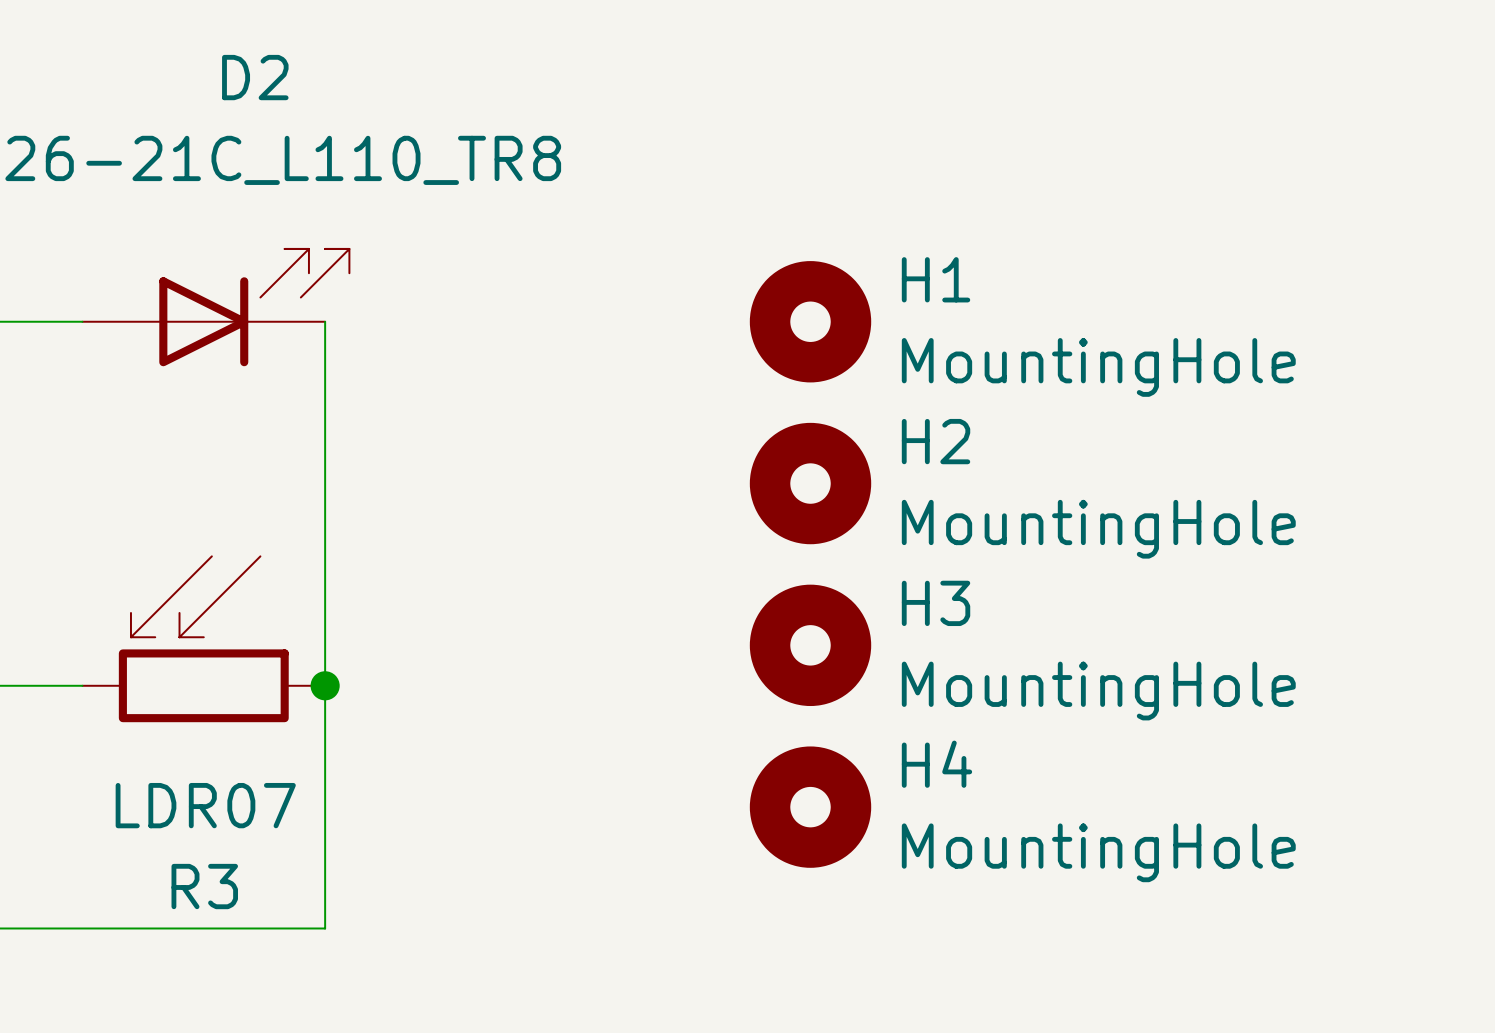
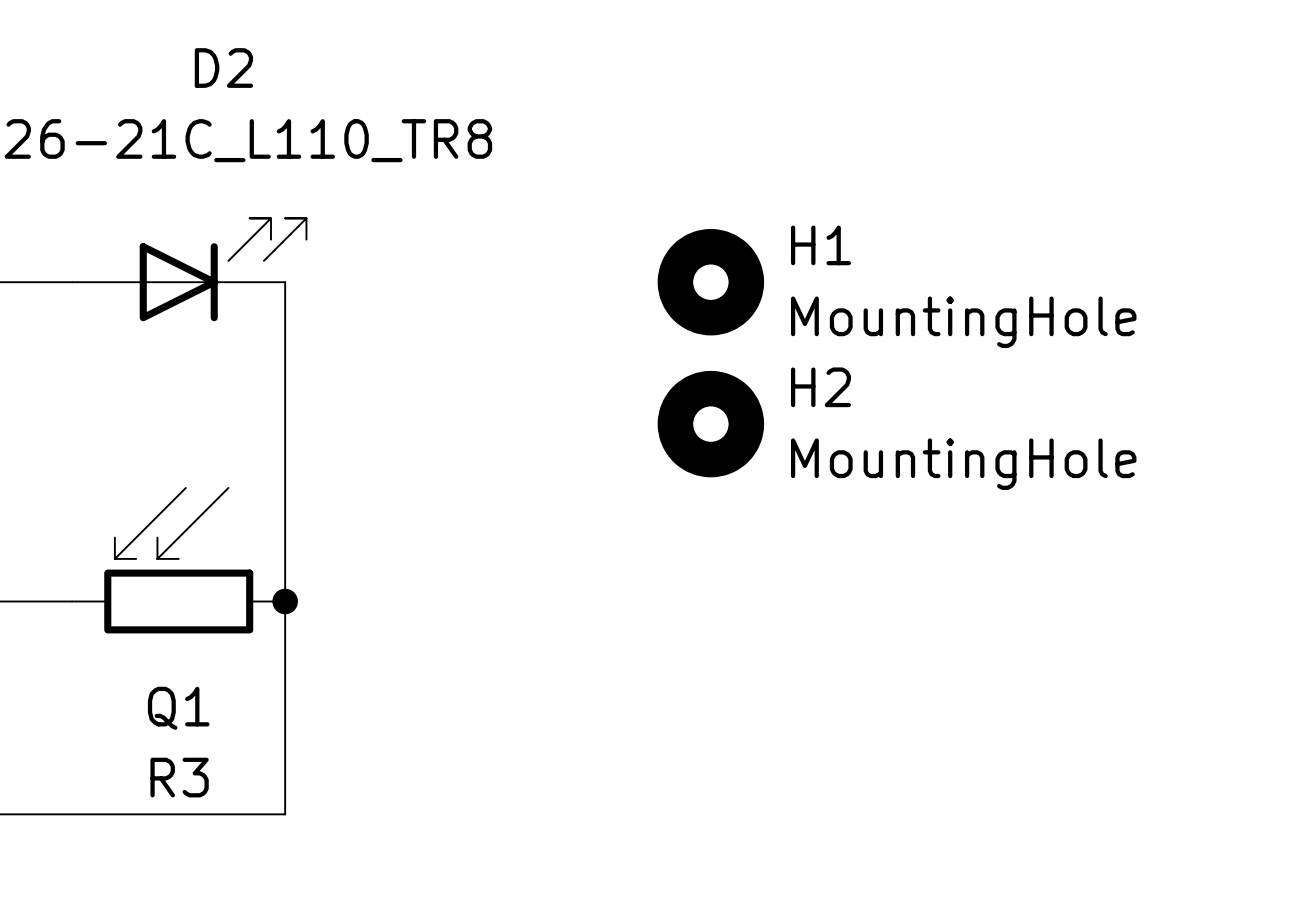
H3: MountingHole (810, 645) -> none
R3 value: LDR07 (205, 805) -> Q1 (178, 708)
H4: MountingHole (810, 807) -> none

